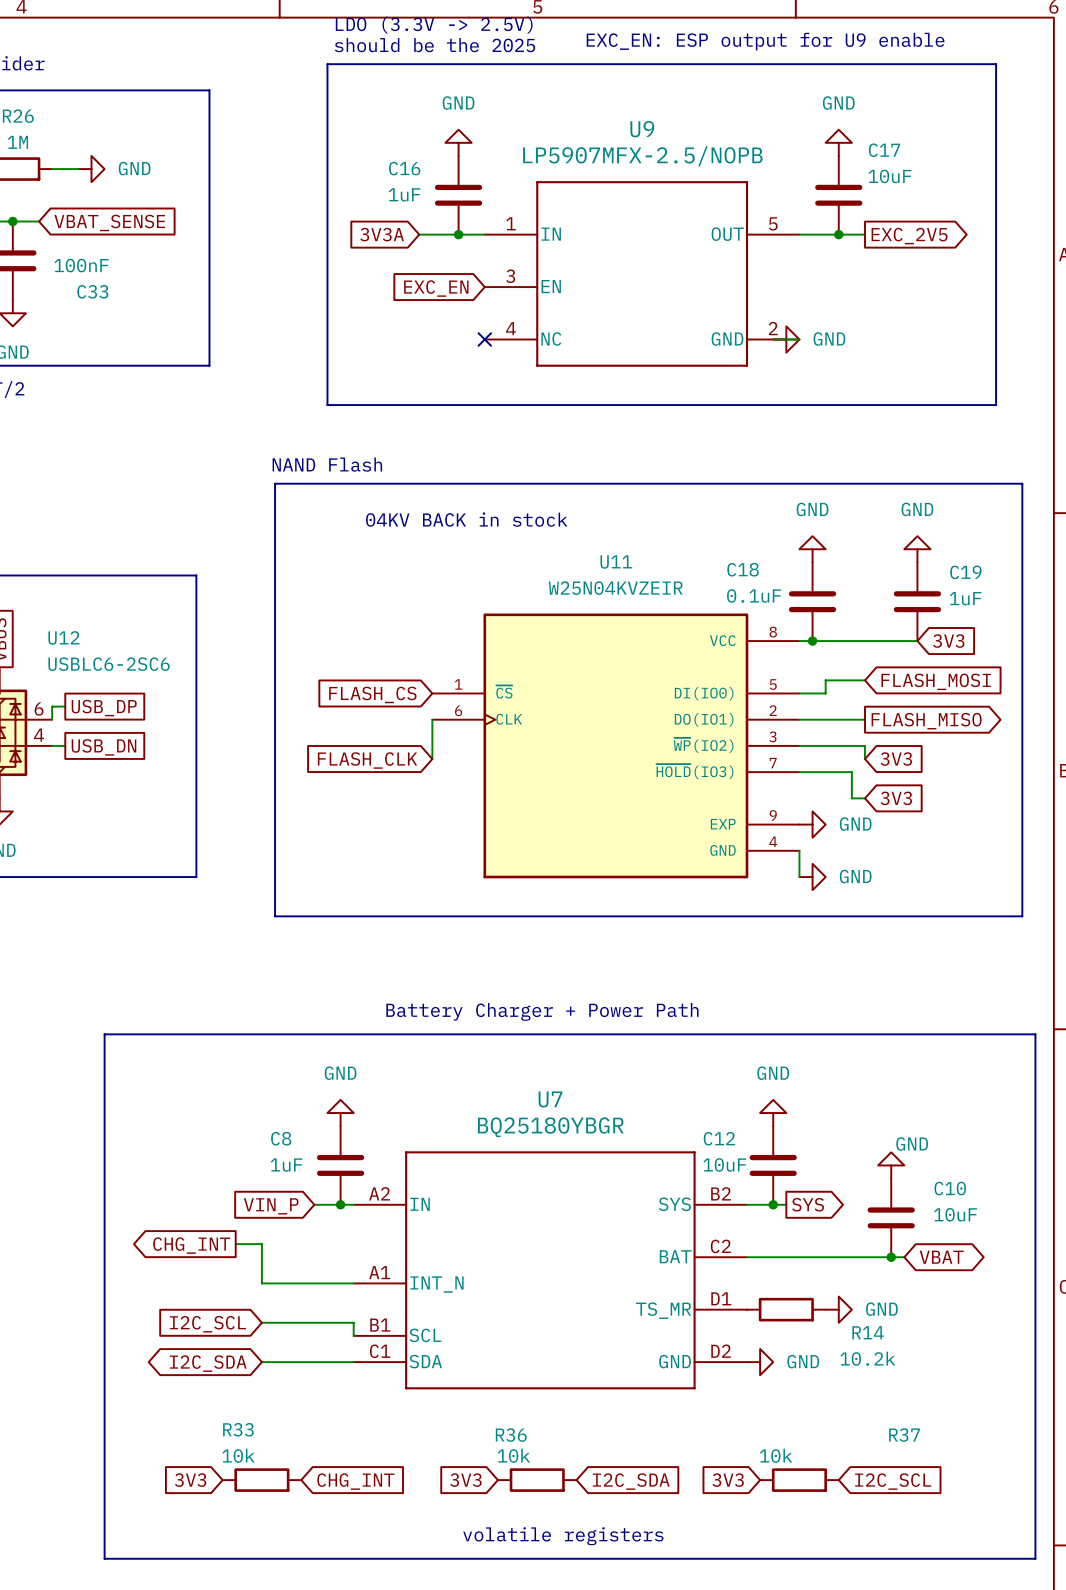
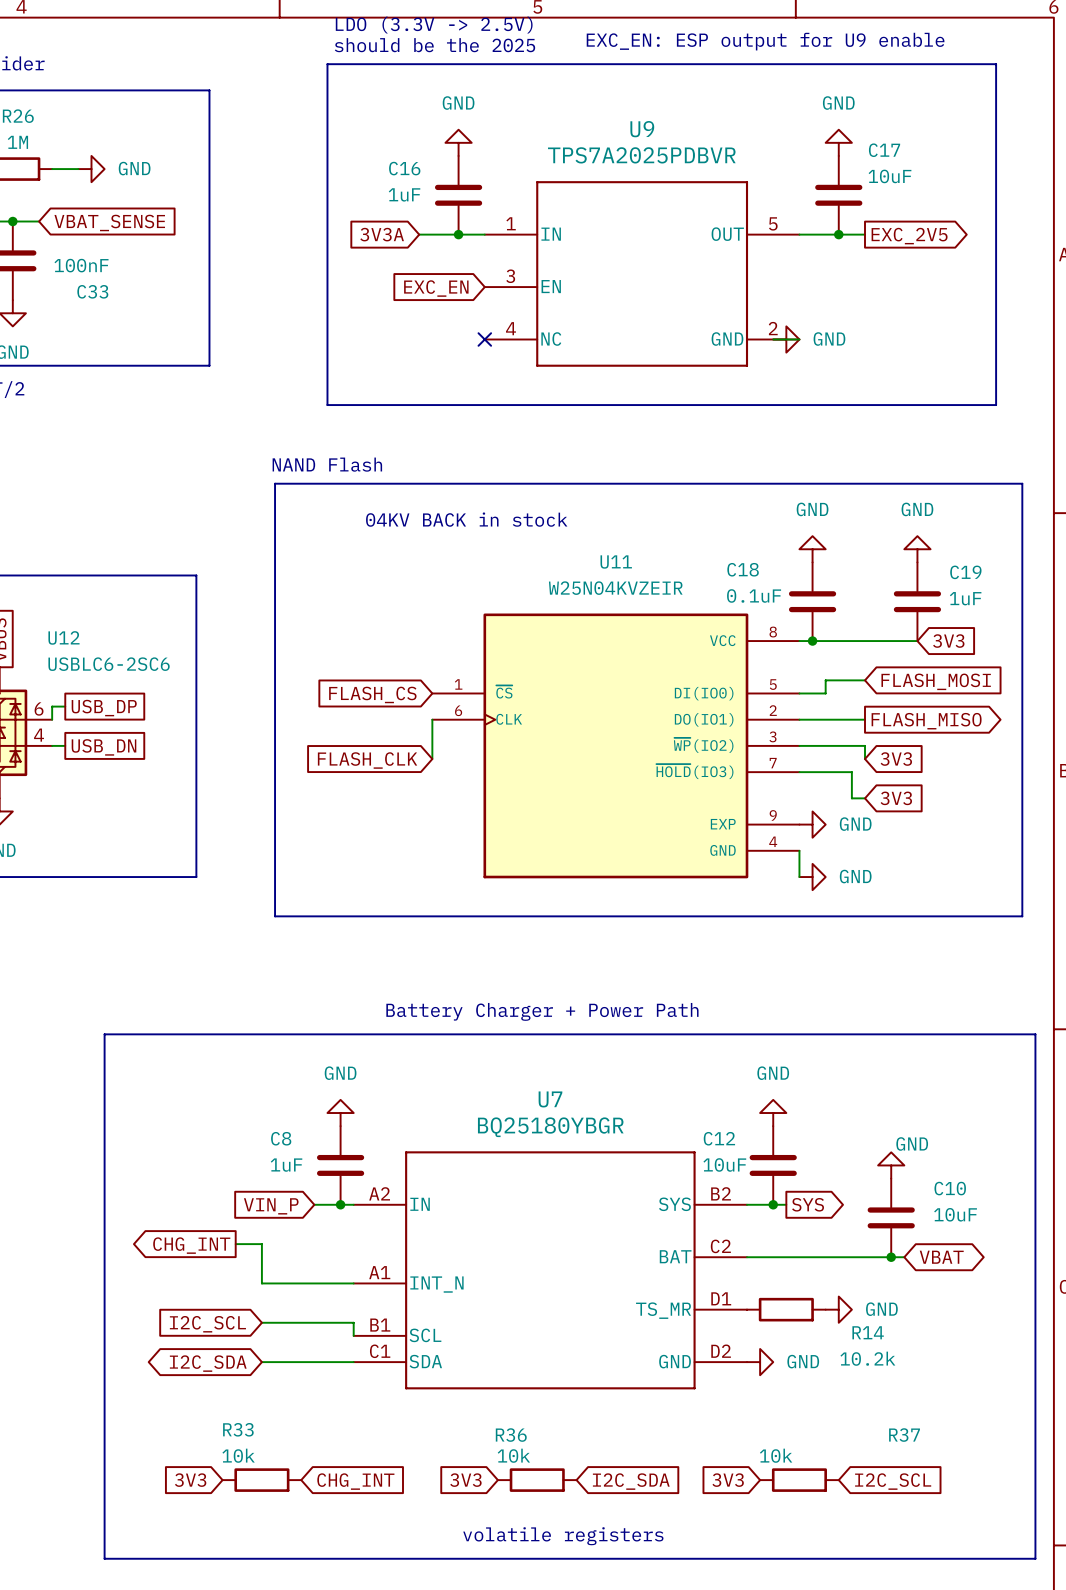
U9 value: LP5907MFX-2.5/NOPB (642, 156) -> TPS7A2025PDBVR (641, 155)

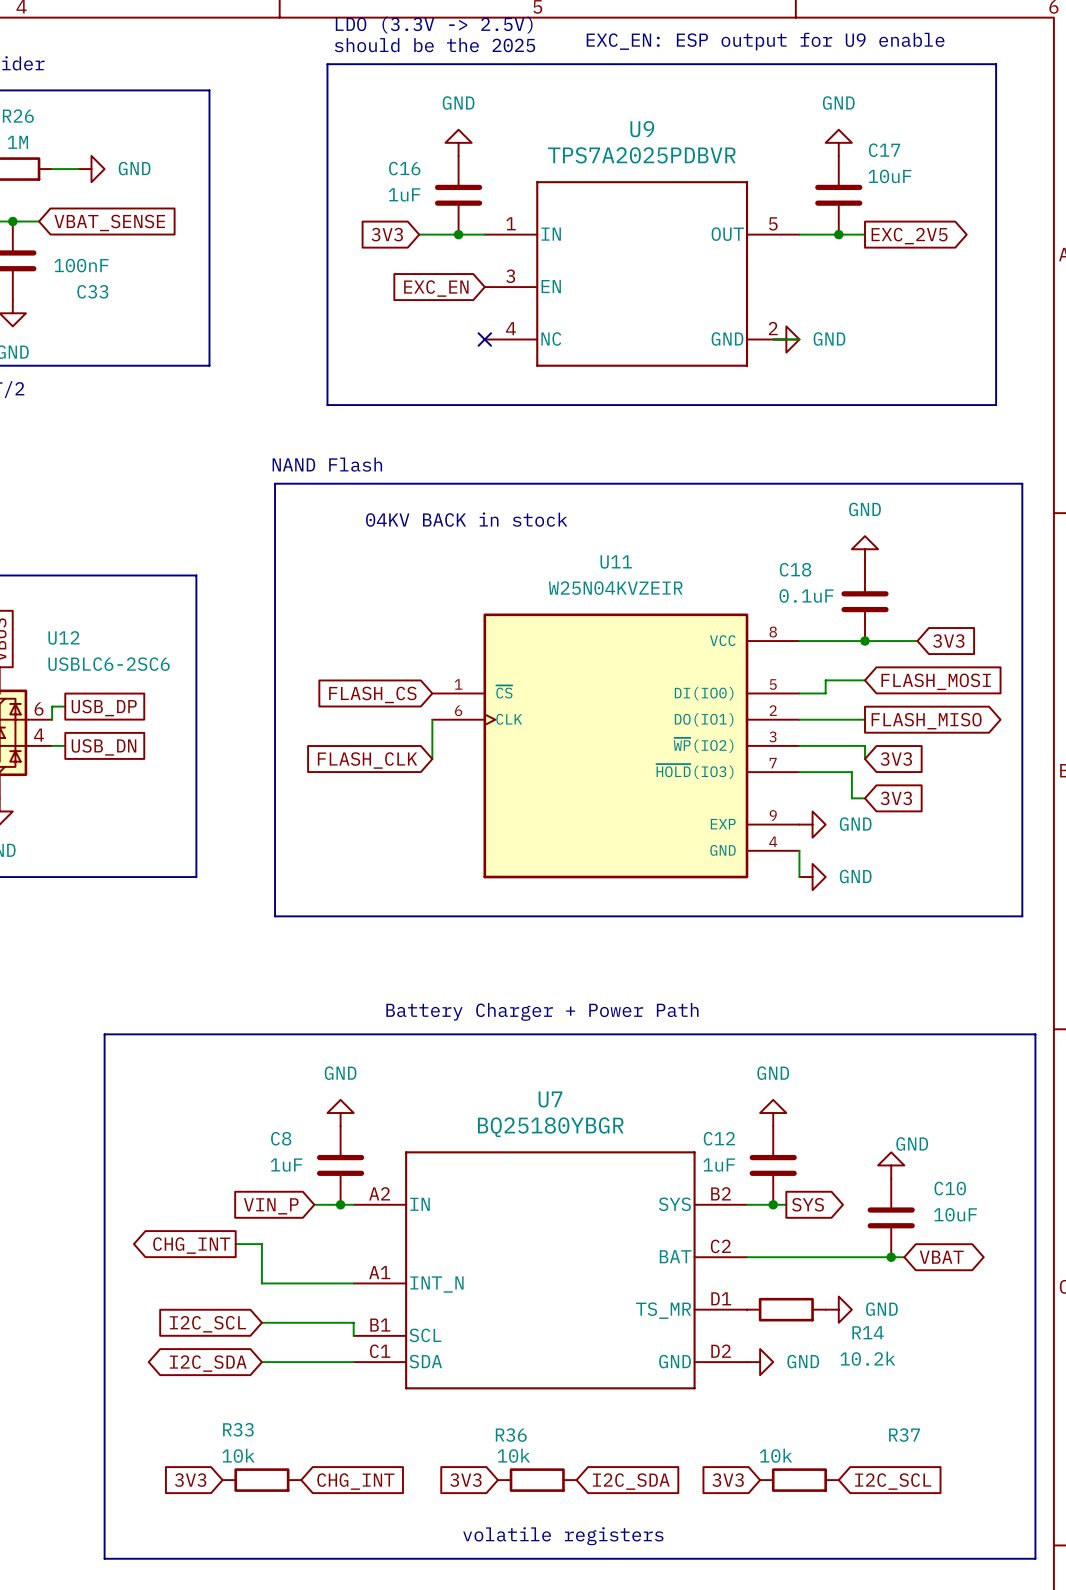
global label: 3V3A (382, 234) -> 3V3 (387, 234)
power symbol: GND (812, 549) -> none
power symbol: none -> GND (865, 549)
power symbol: GND (917, 549) -> none
C18 position: (812, 601) -> (865, 601)
C19: 1uF (917, 601) -> none
junction position: (812, 641) -> (865, 641)
C12 value: 10uF (724, 1164) -> 1uF (719, 1165)

